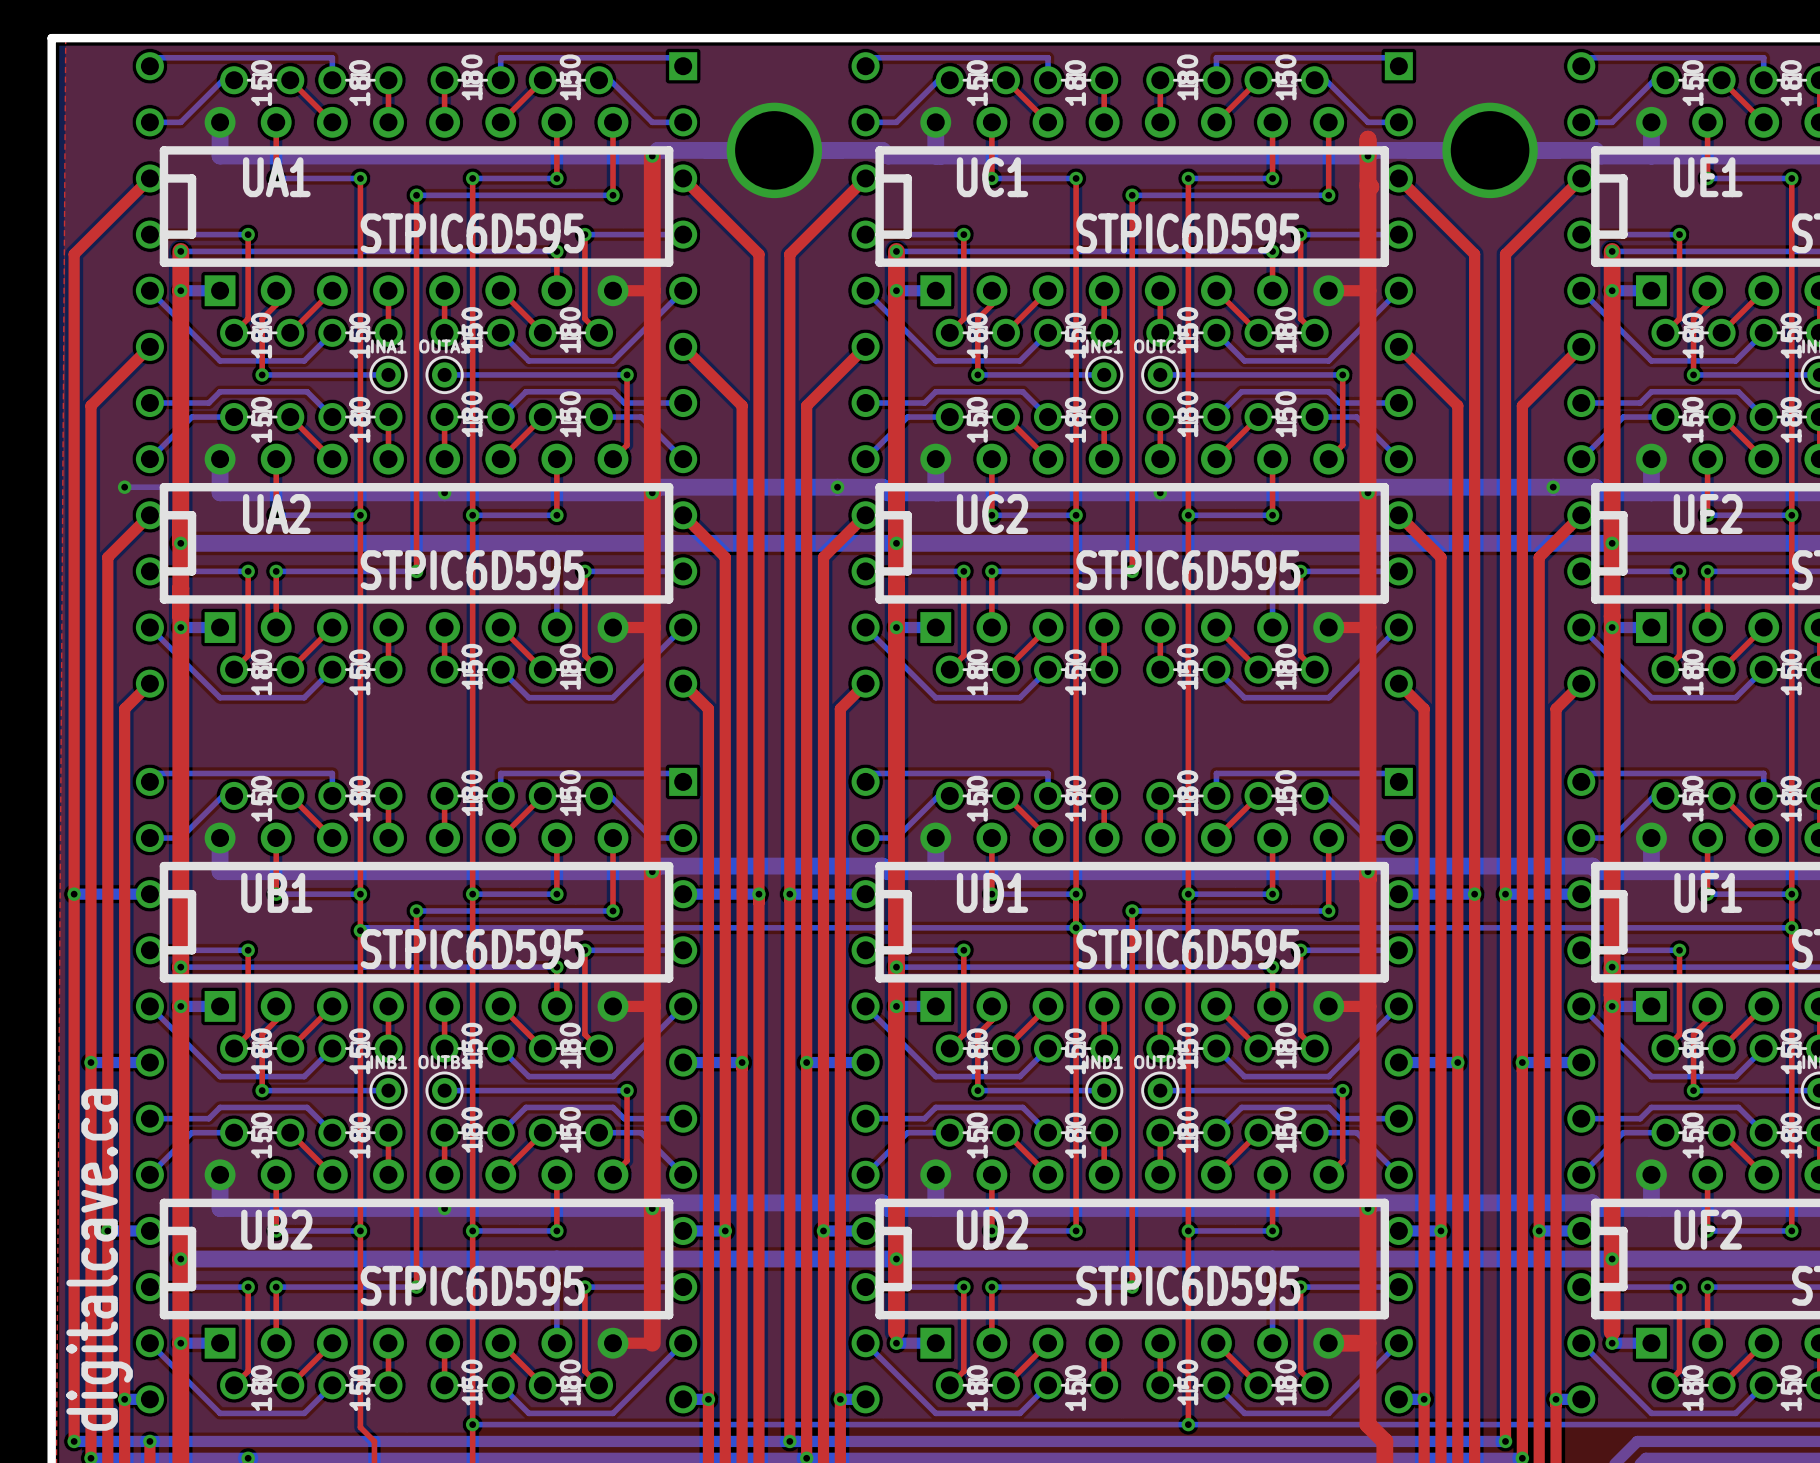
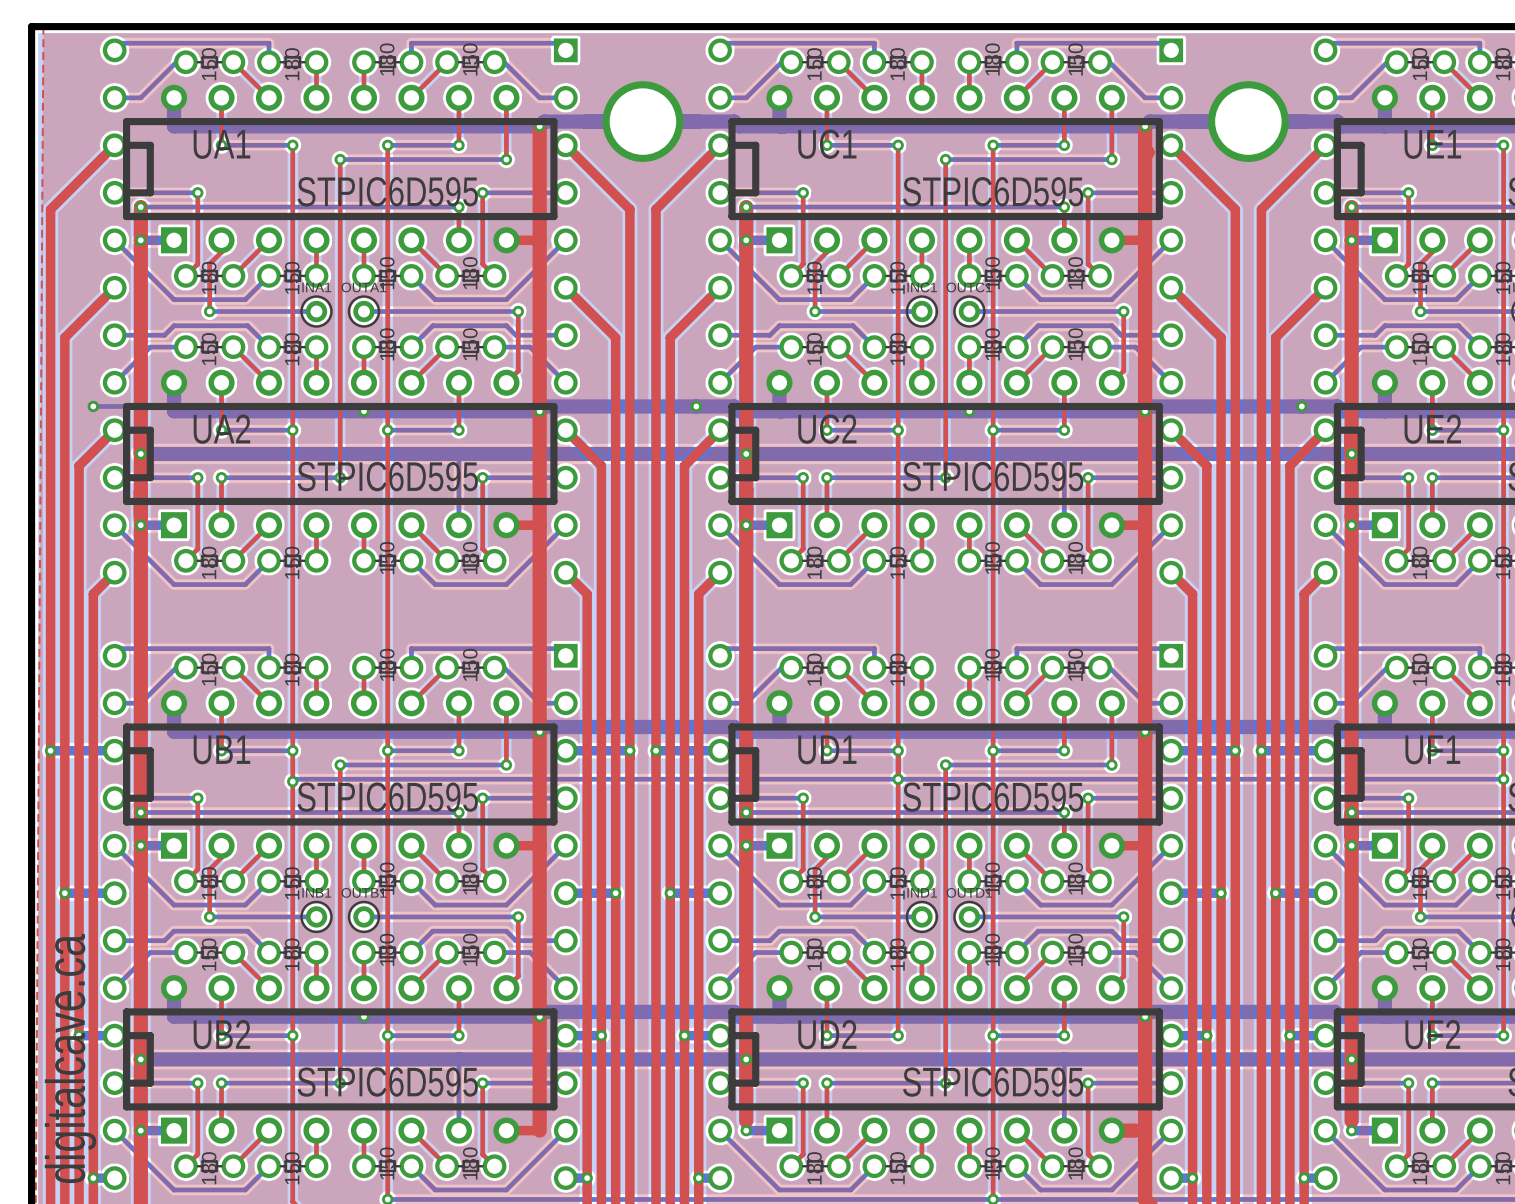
top track: (1367, 139) (1367, 156) -> none

